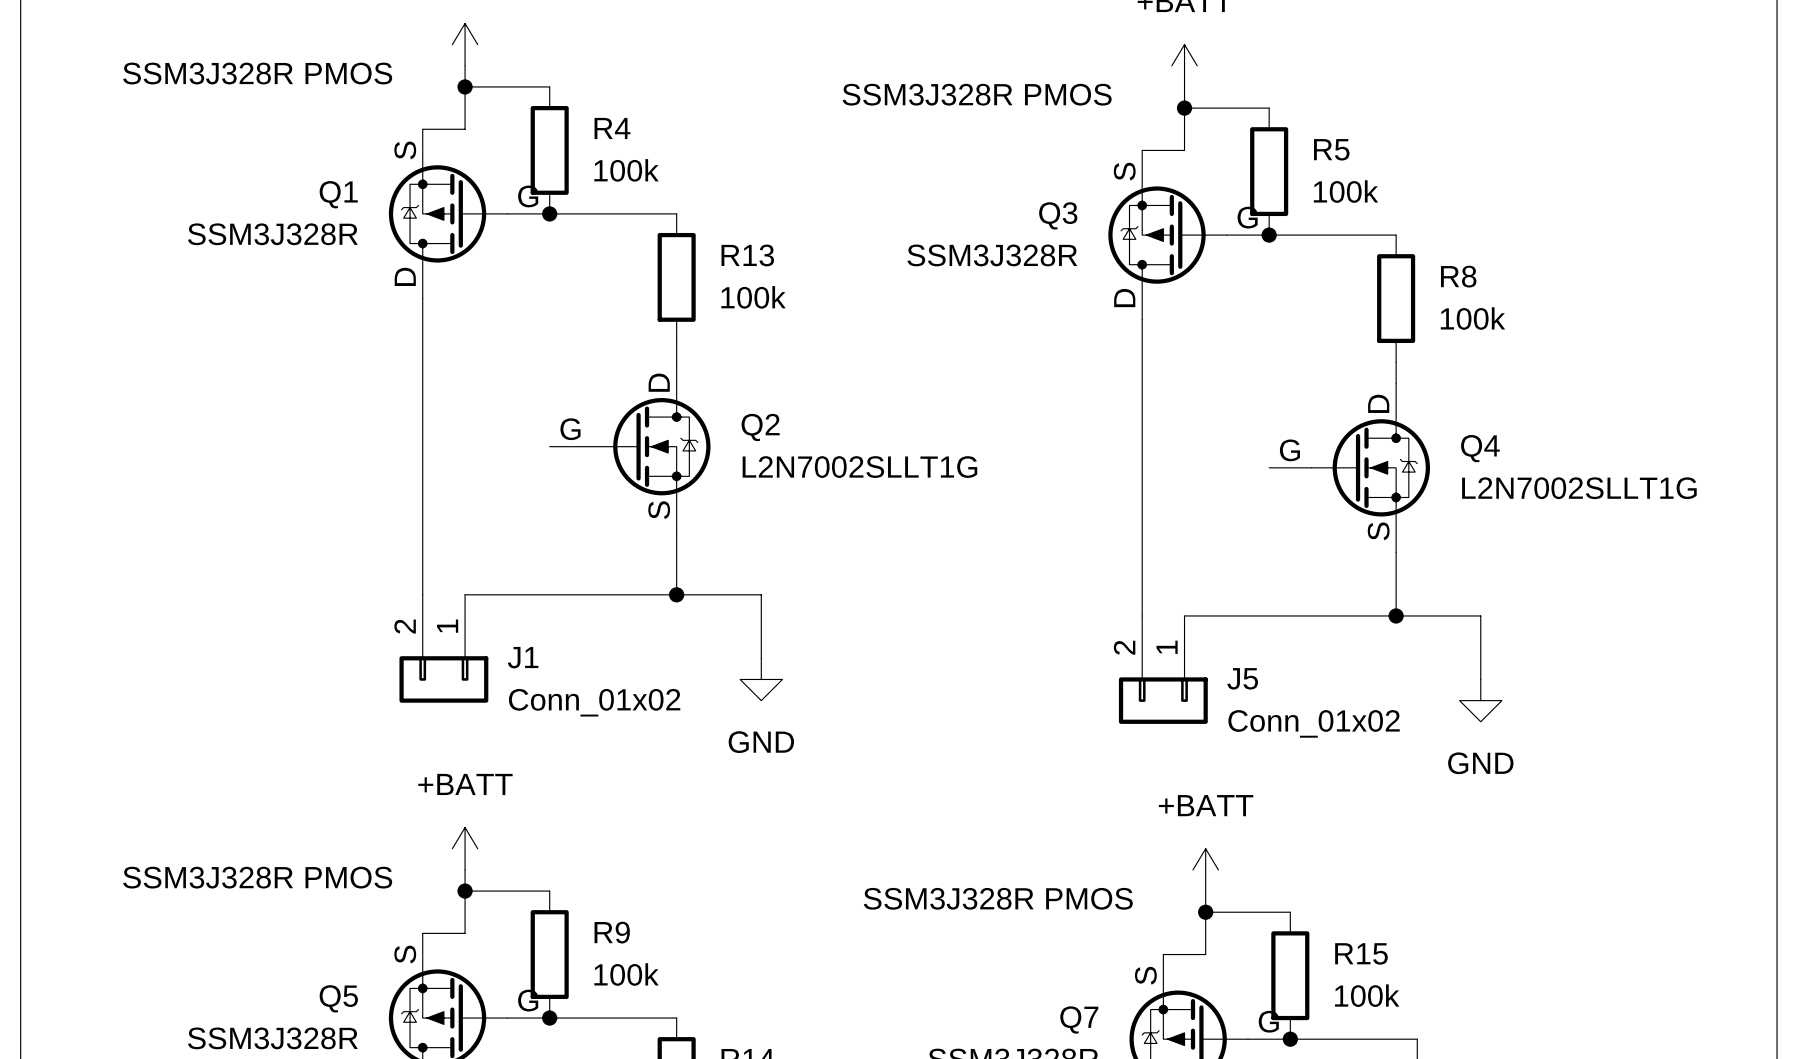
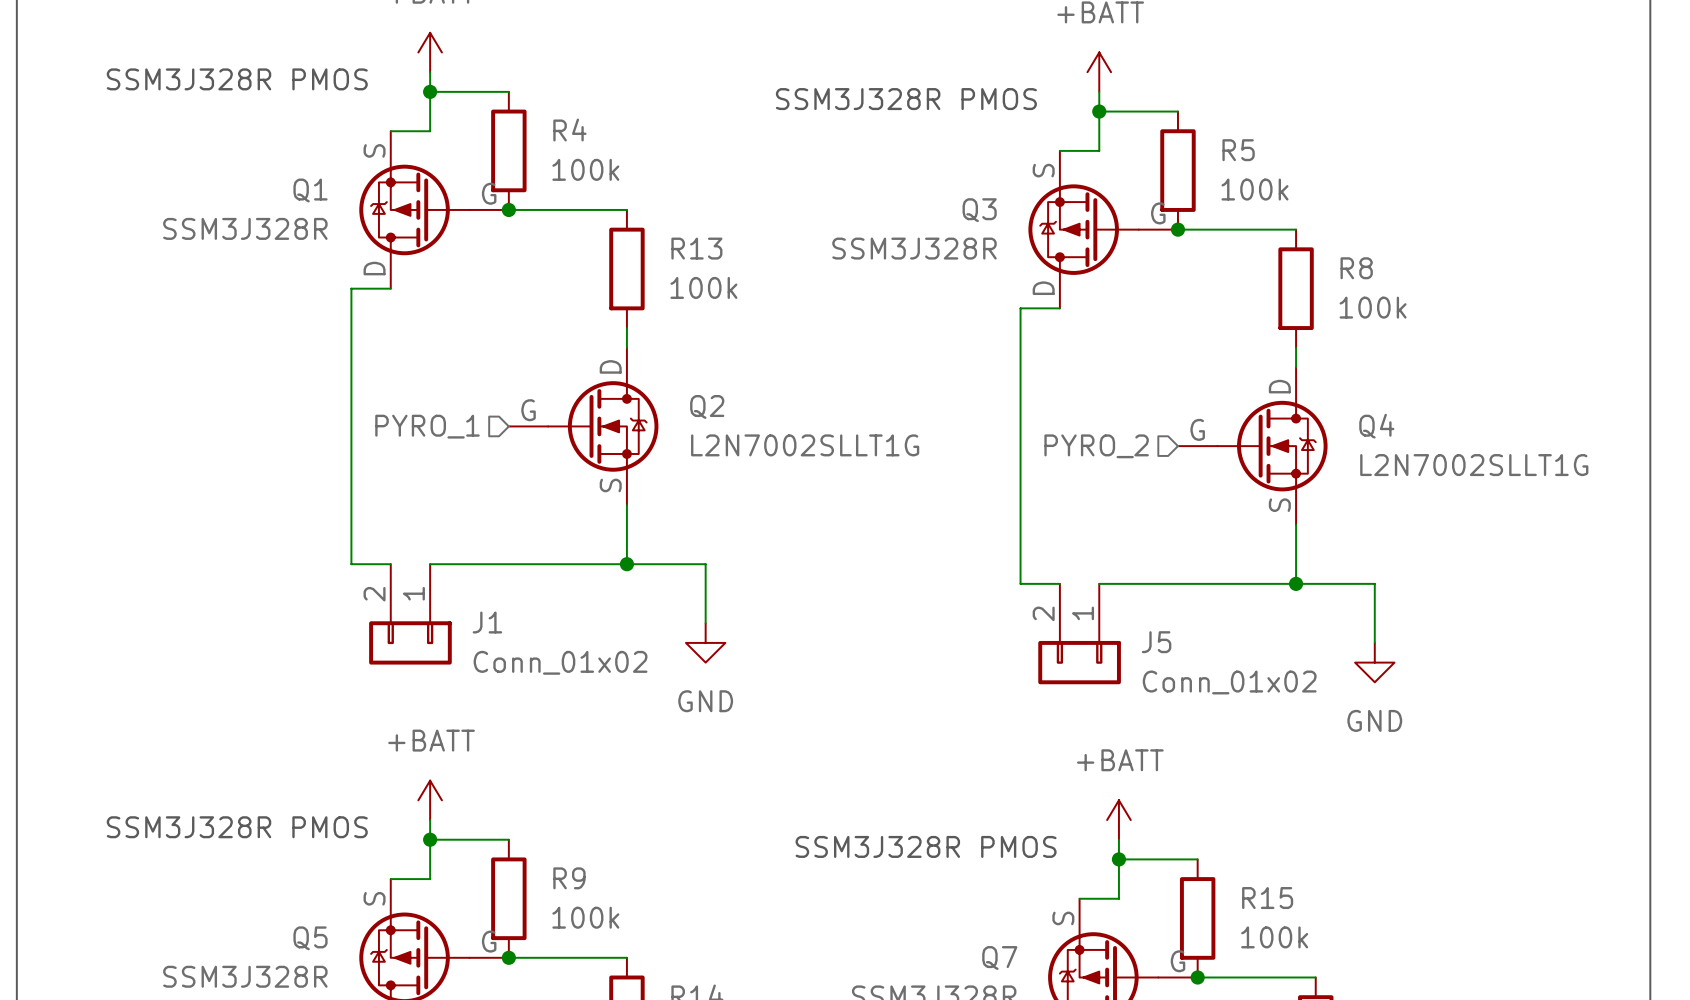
wire: (422, 298) (422, 594) -> (390, 288) (351, 288) (351, 564) (390, 564)
wire: (1142, 319) (1142, 615) -> (1059, 308) (1020, 308) (1020, 583) (1059, 583)
hierarchical label: none -> PYRO_1 (427, 426)
hierarchical label: none -> PYRO_2 (1096, 446)

